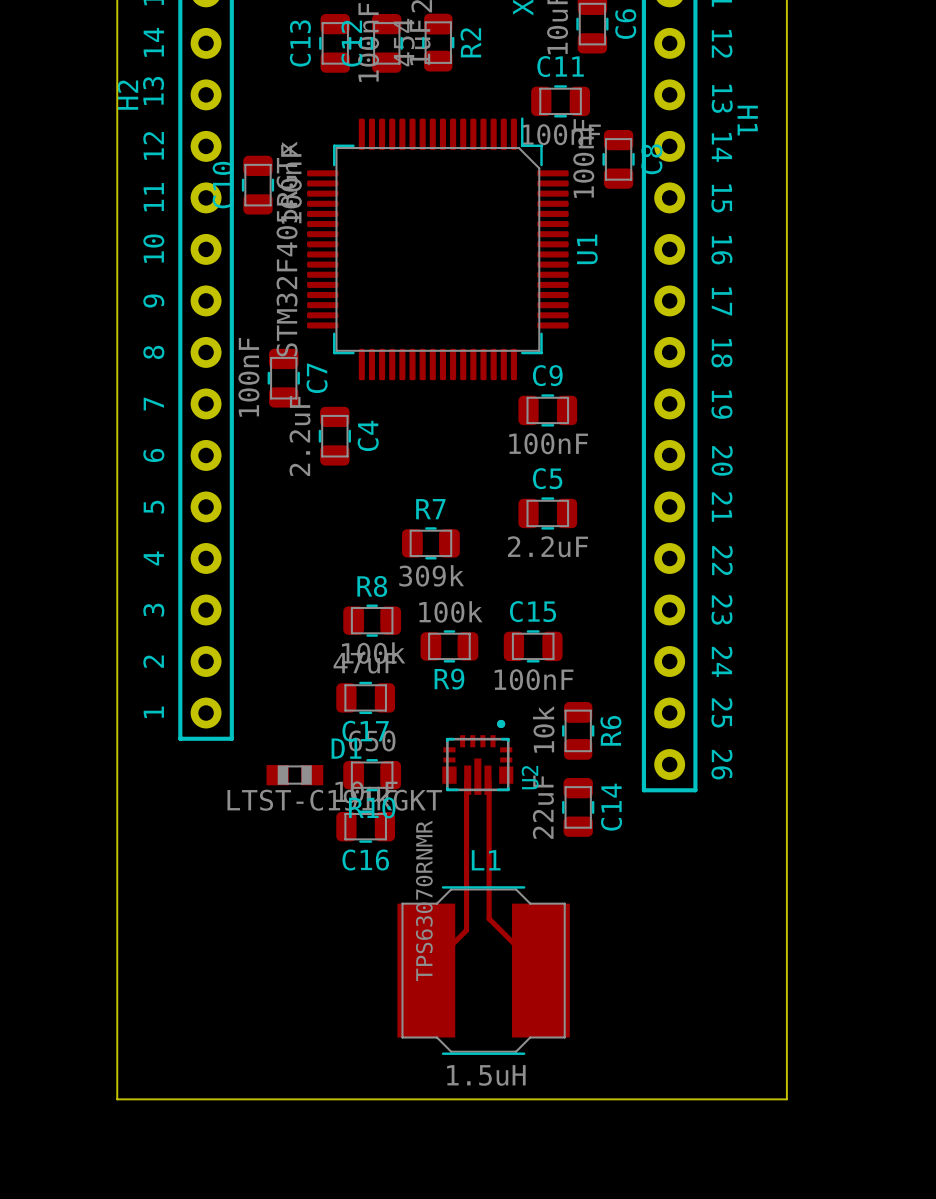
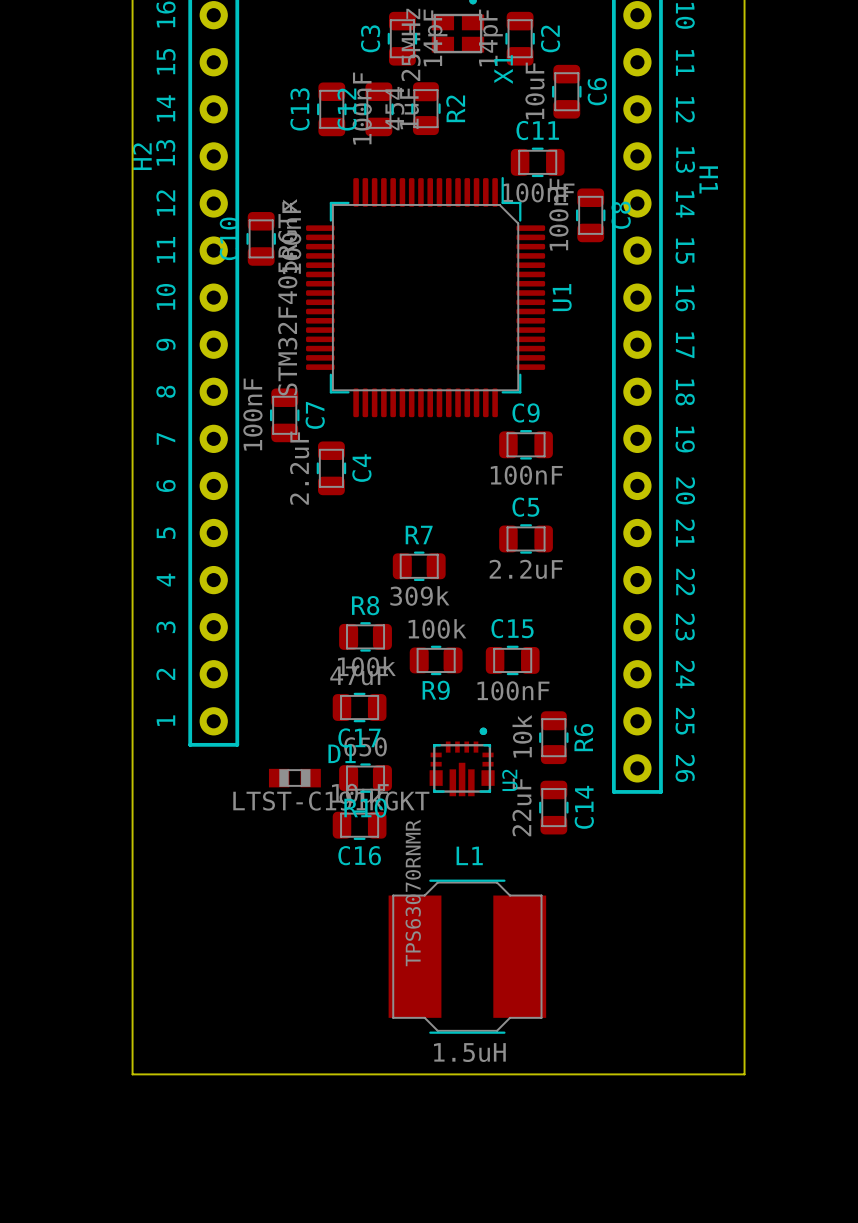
top track: (466, 781) (466, 930) (426, 970) -> none
top track: (489, 781) (489, 918) (540, 970) -> none

